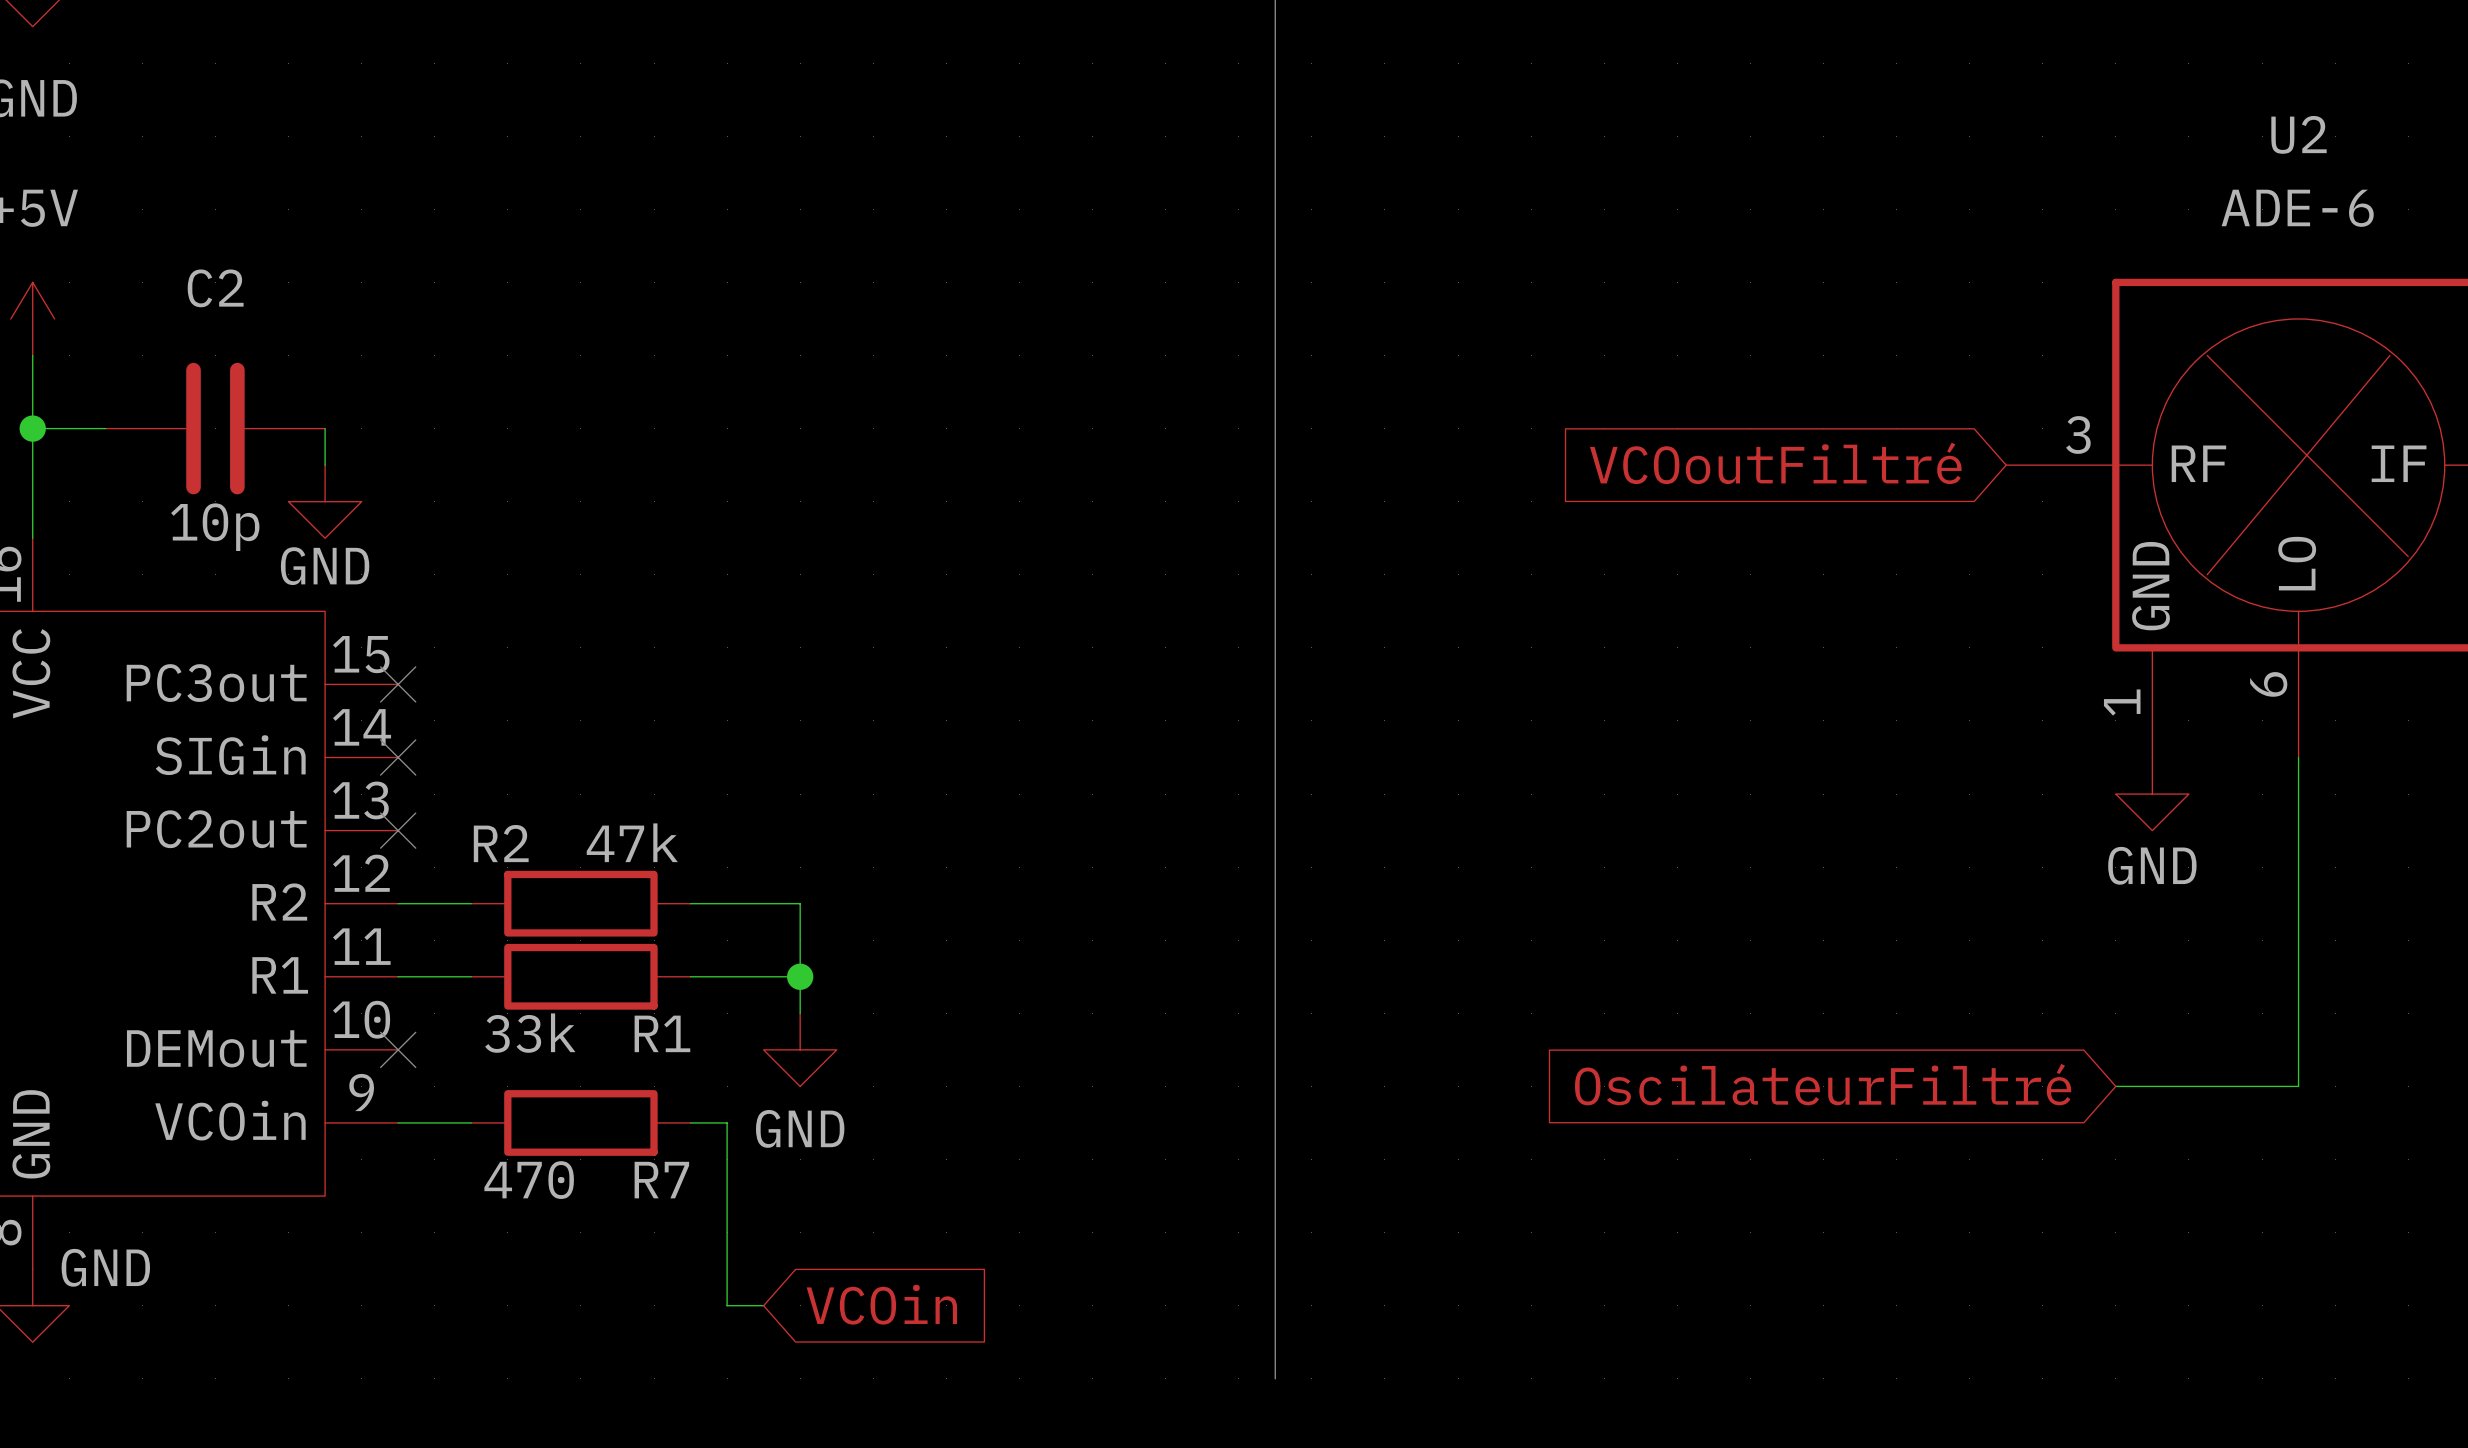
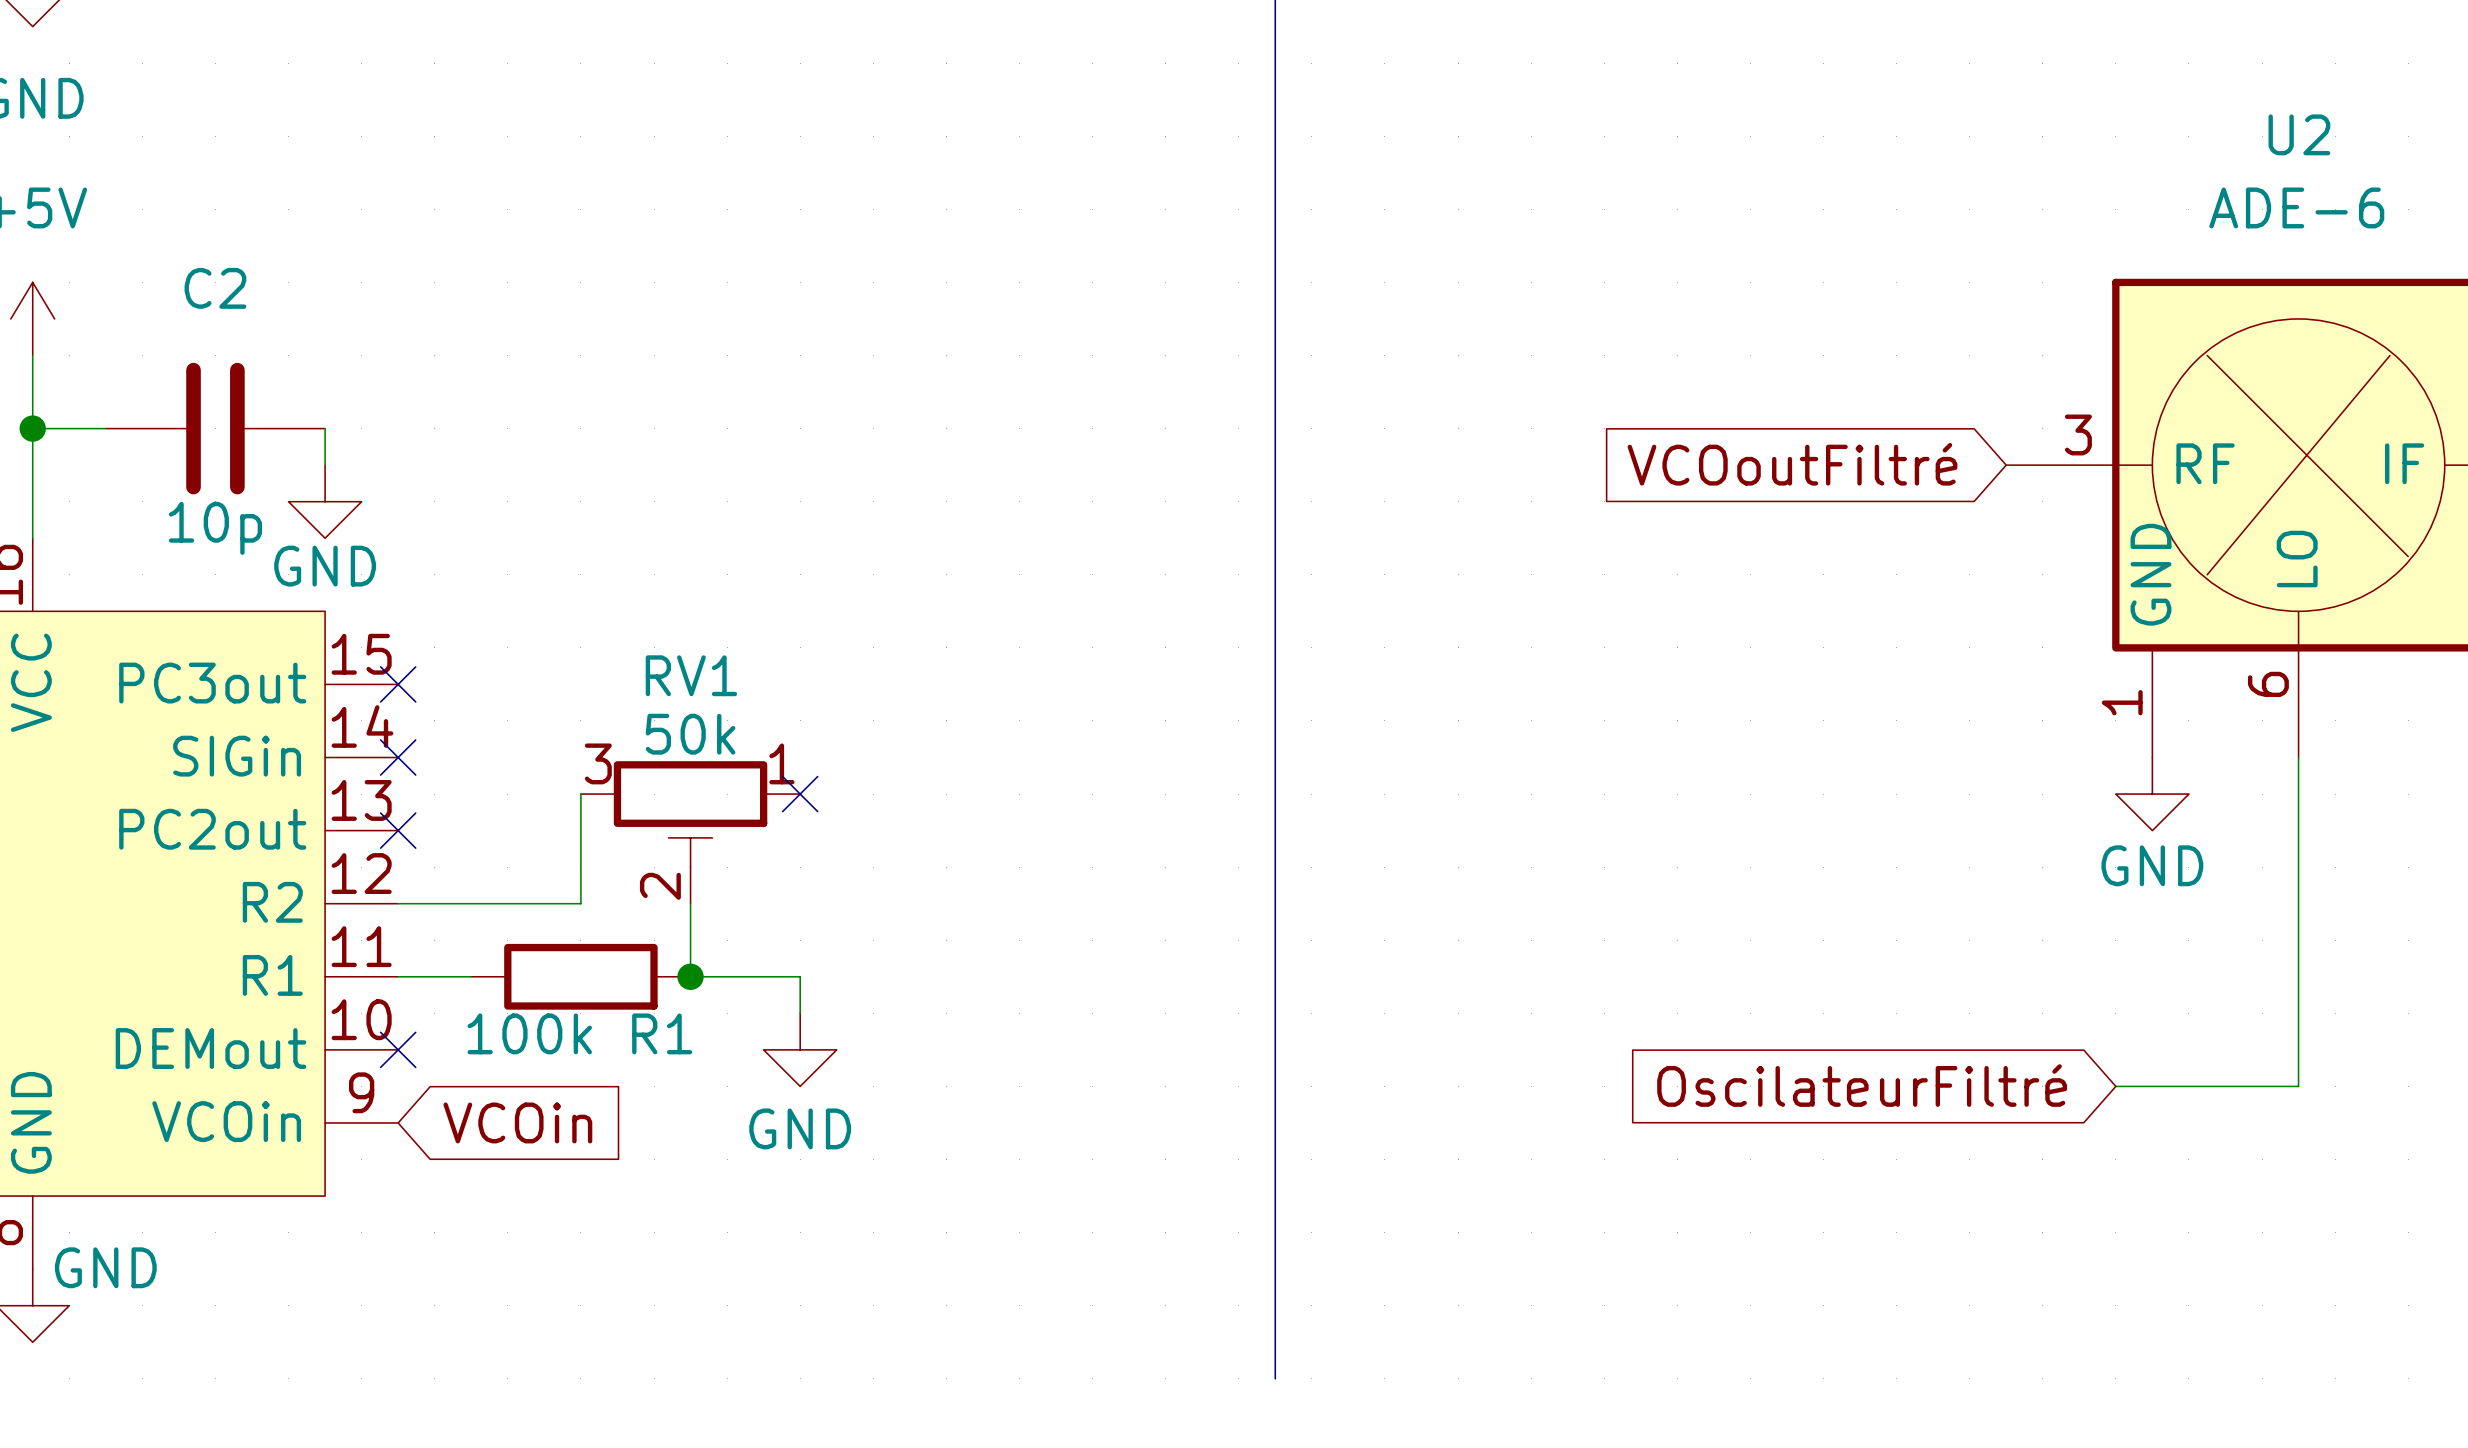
wire: none -> (580, 794) (580, 903) (471, 903)
no-connect mark: none -> (800, 794)
RV1: none -> 50k (690, 832)
R2: 47k (580, 903) -> none
wire: (690, 903) (800, 903) (800, 976) -> (690, 903) (690, 976)
junction position: (800, 976) -> (690, 976)
R1 value: 33k (530, 1033) -> 100k (529, 1033)
wire: (398, 1122) (471, 1122) -> none
R7: 470 (580, 1122) -> none
wire: (690, 1122) (727, 1122) (727, 1305) (763, 1305) -> none
global label position: VCOin (881, 1304) -> VCOin (517, 1122)

